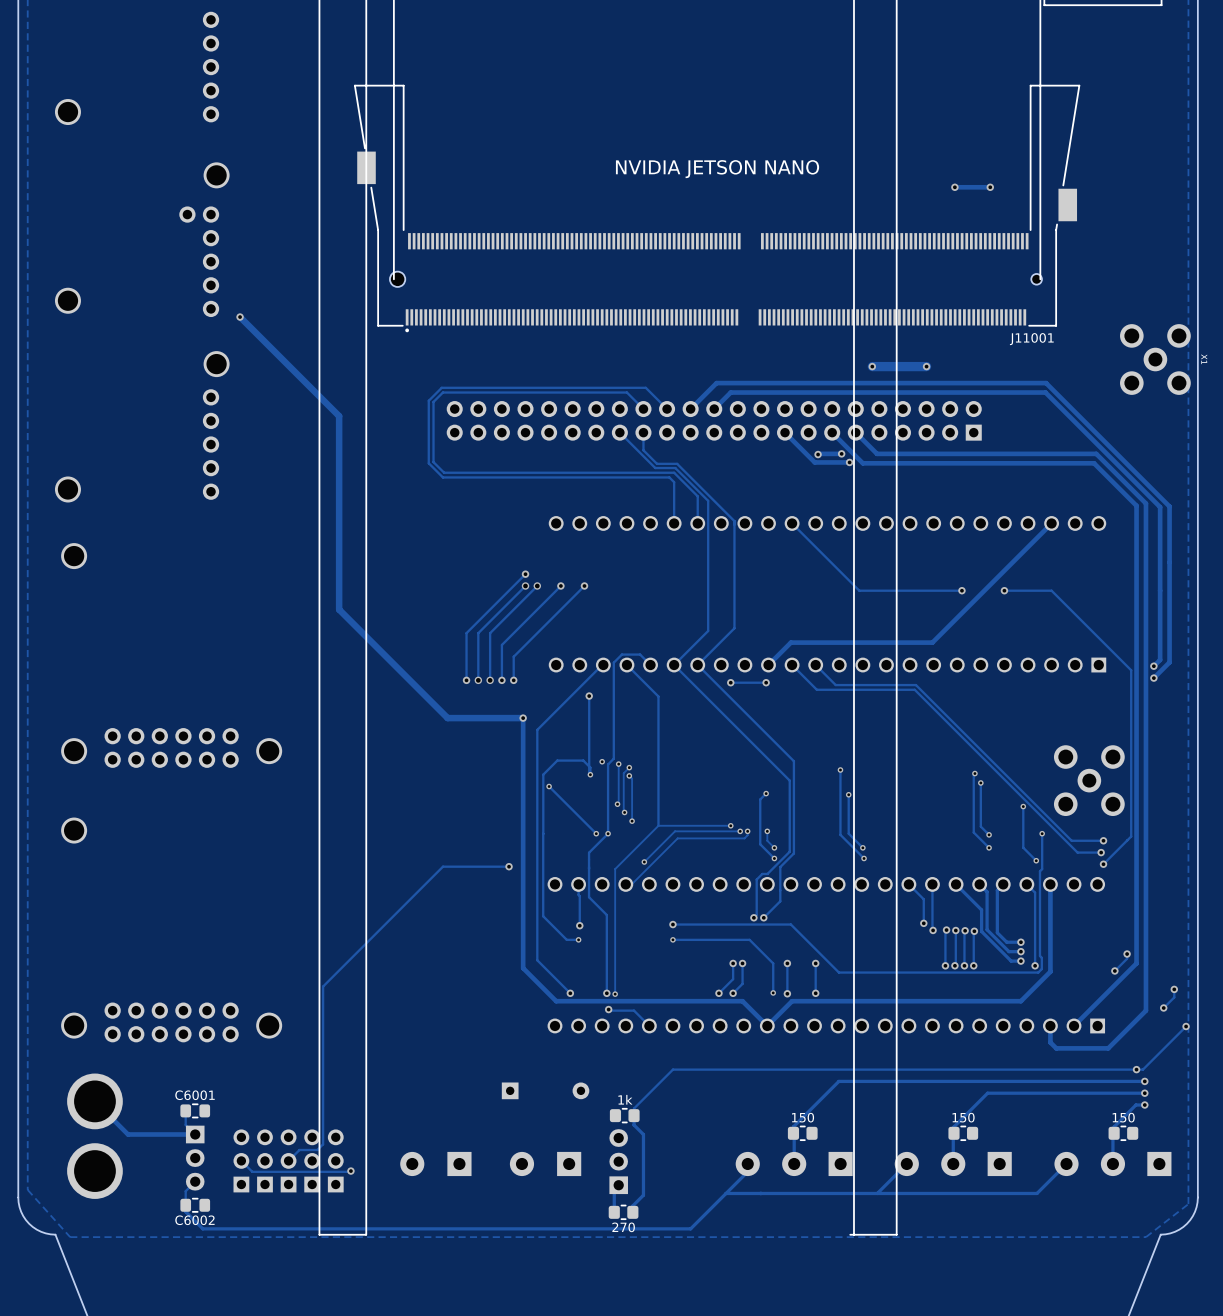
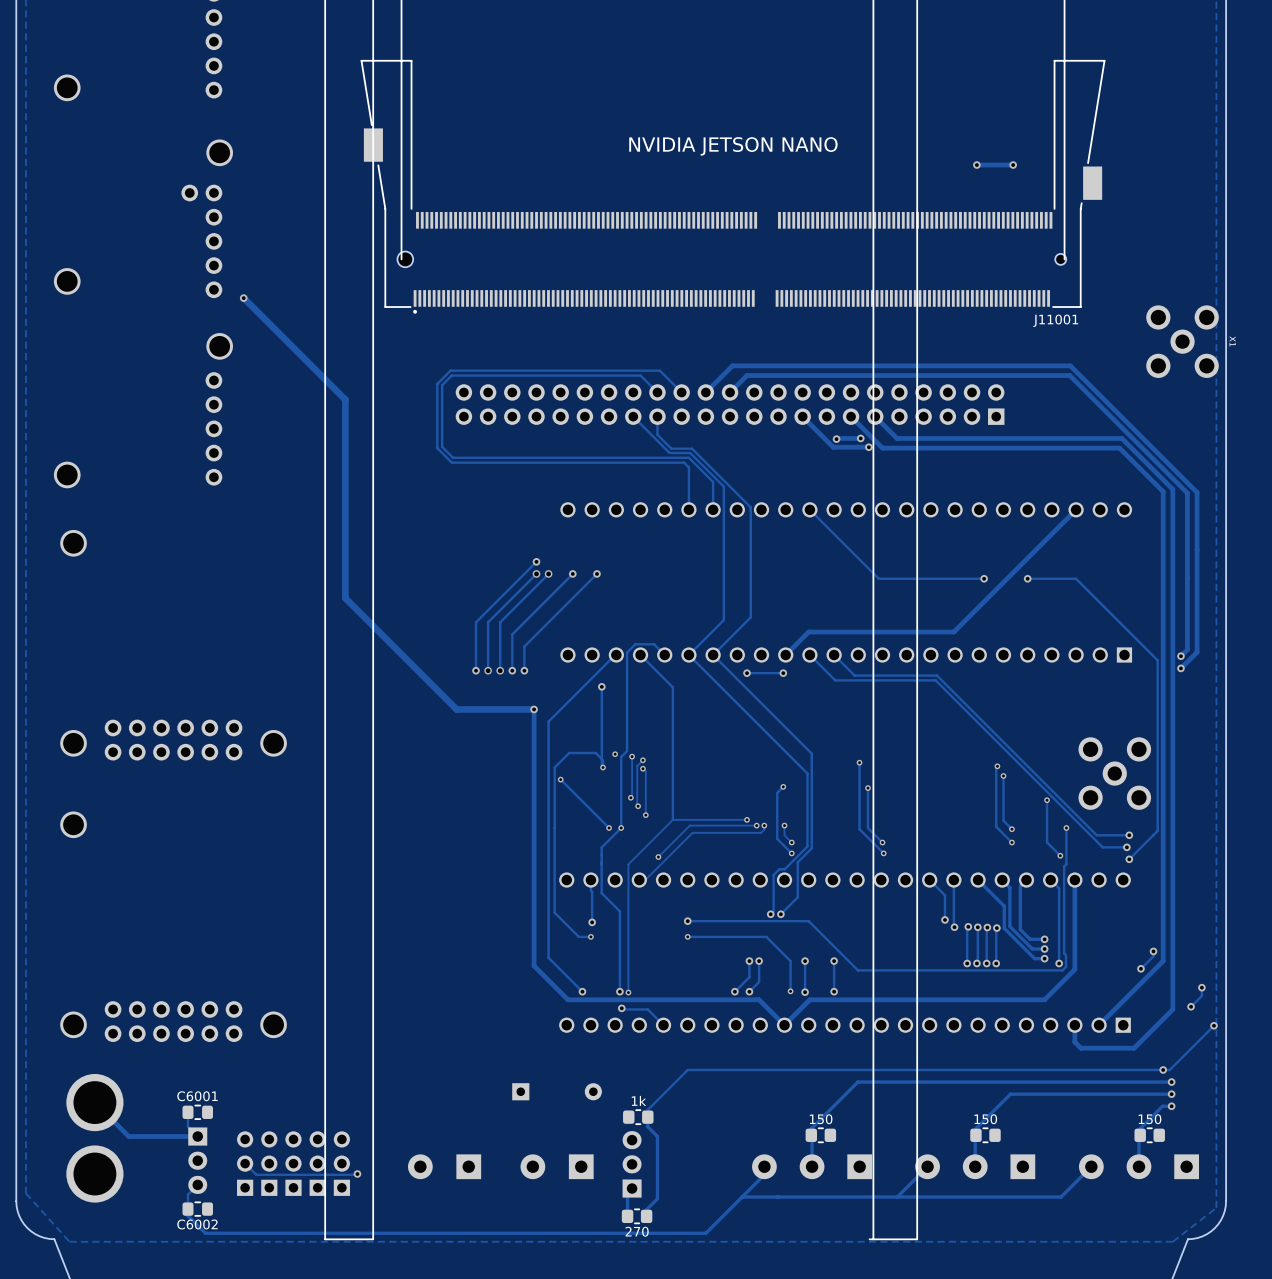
via: (872, 366) -> none
track: (926, 366) (872, 366) -> none
via: (926, 366) -> none
track: (509, 866) (442, 866) (323, 986) (323, 1144) (317, 1150) (299, 1150) (288, 1160) -> none
via: (509, 866) -> none

